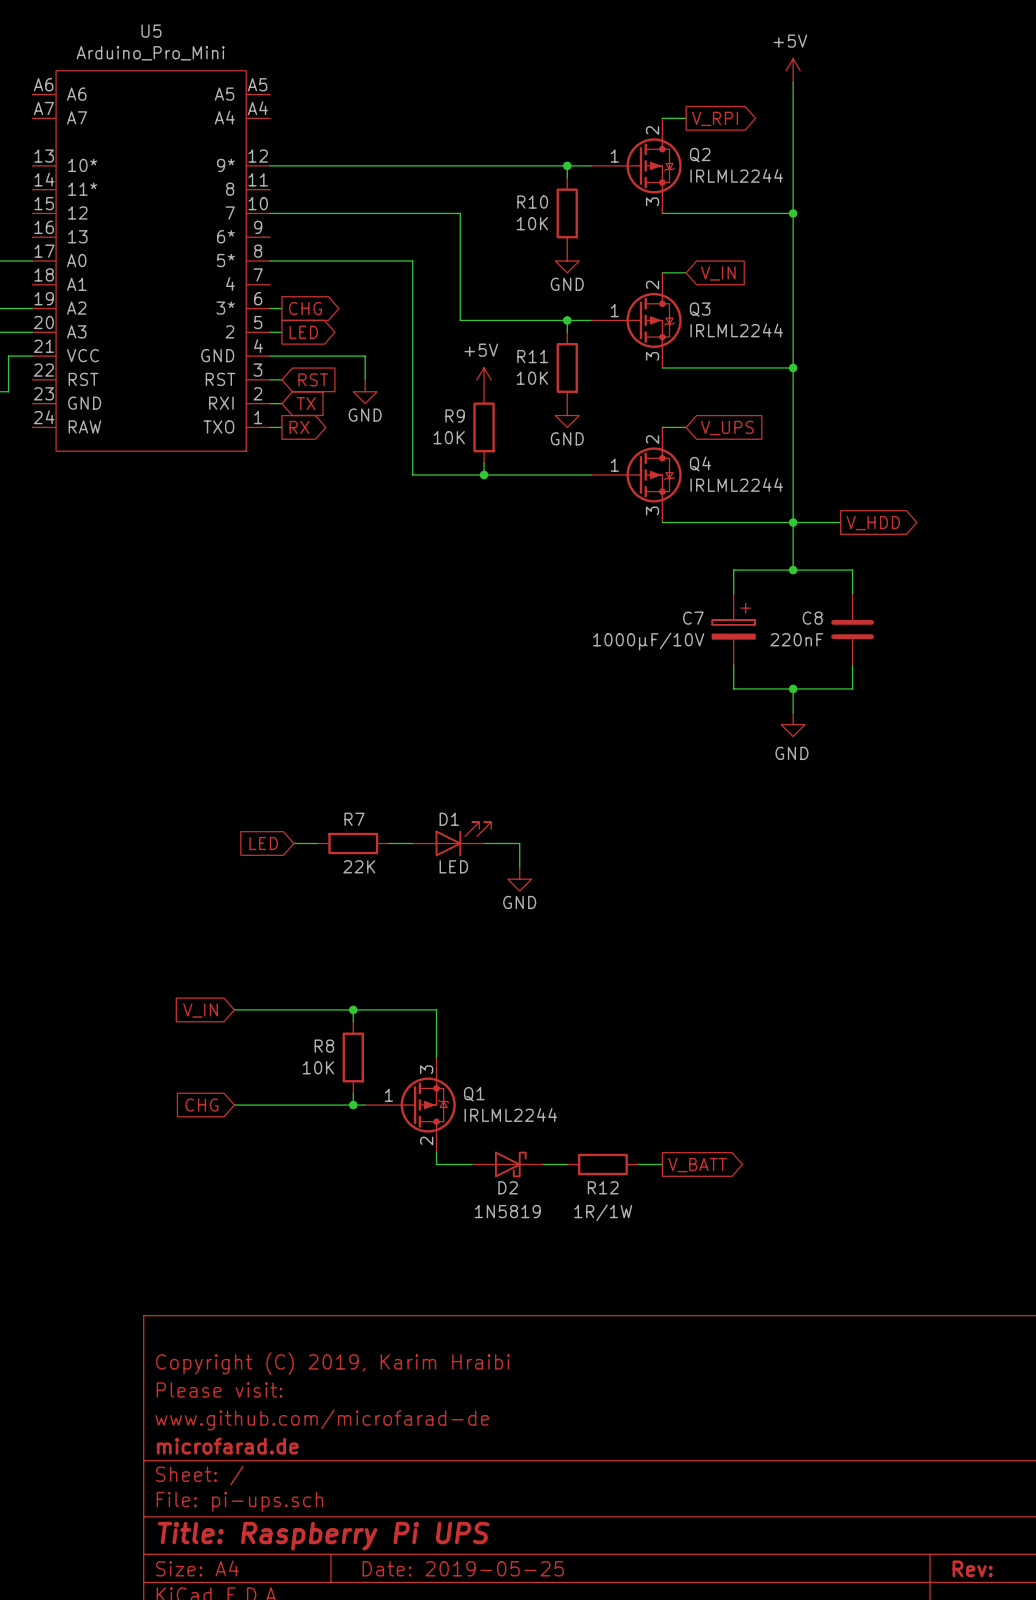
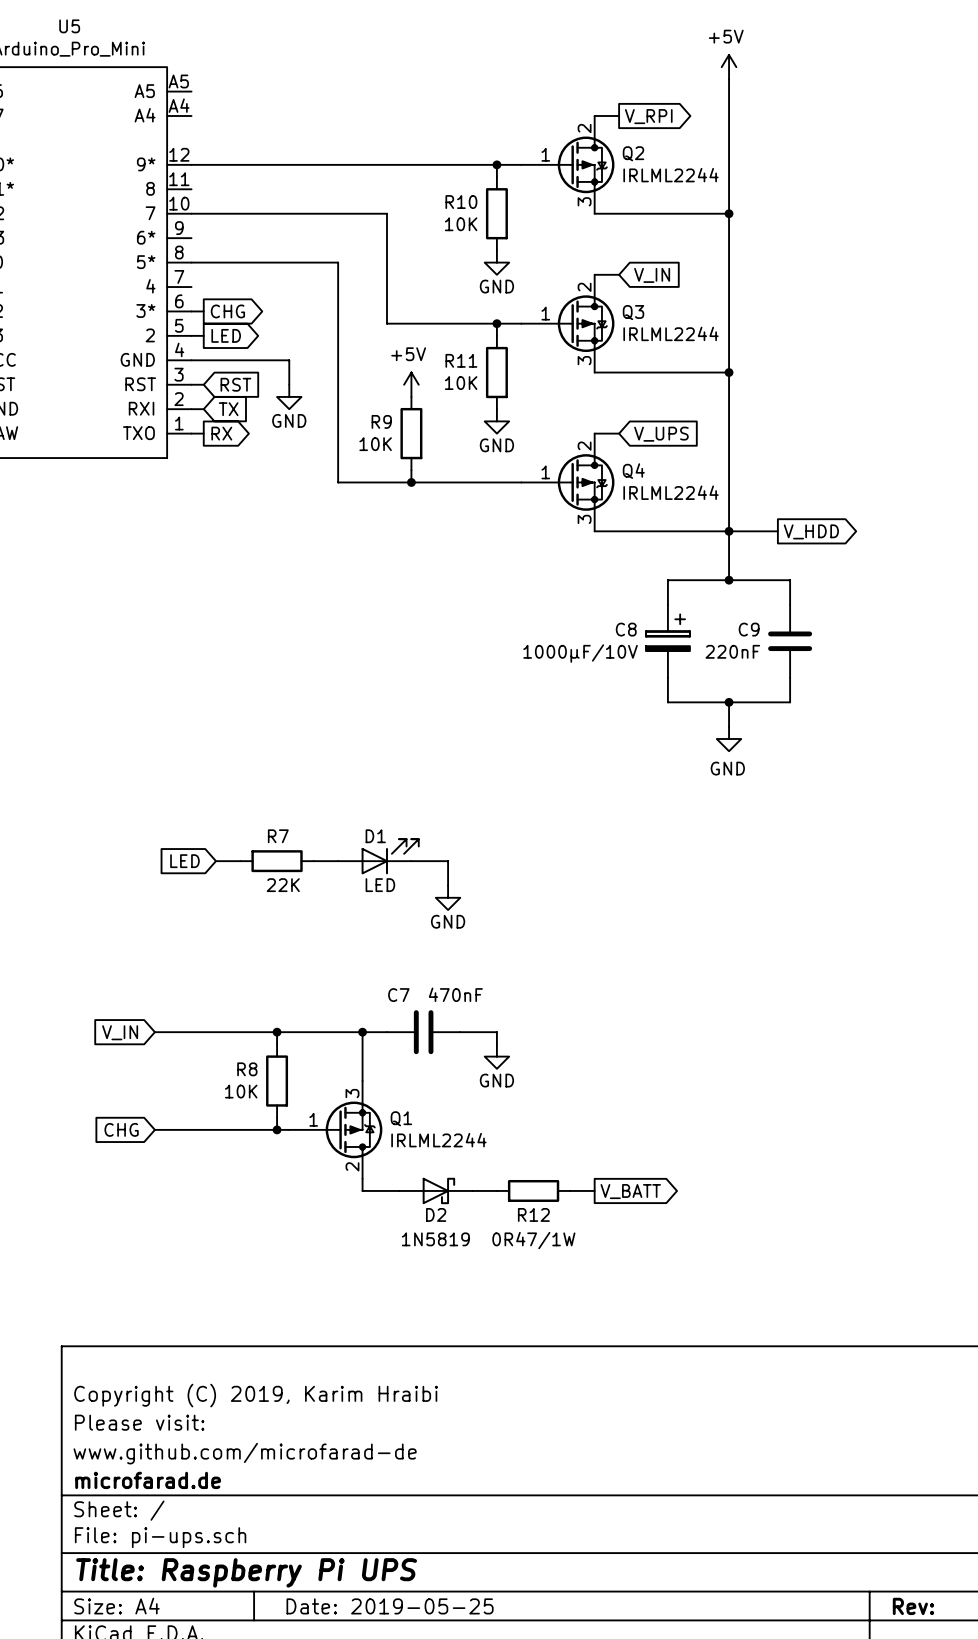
C7 name: C7 (693, 618) -> C8 (626, 629)
C8 name: C8 (812, 618) -> C9 (749, 629)
wire: none -> (362, 1032) (386, 1032)
junction: none -> (362, 1032)
C7: none -> 470nF (423, 1032)
wire: none -> (460, 1032) (496, 1032) (496, 1044)
power symbol: none -> GND (496, 1056)
R12 value: 1R/1W (603, 1212) -> 0R47/1W (533, 1240)

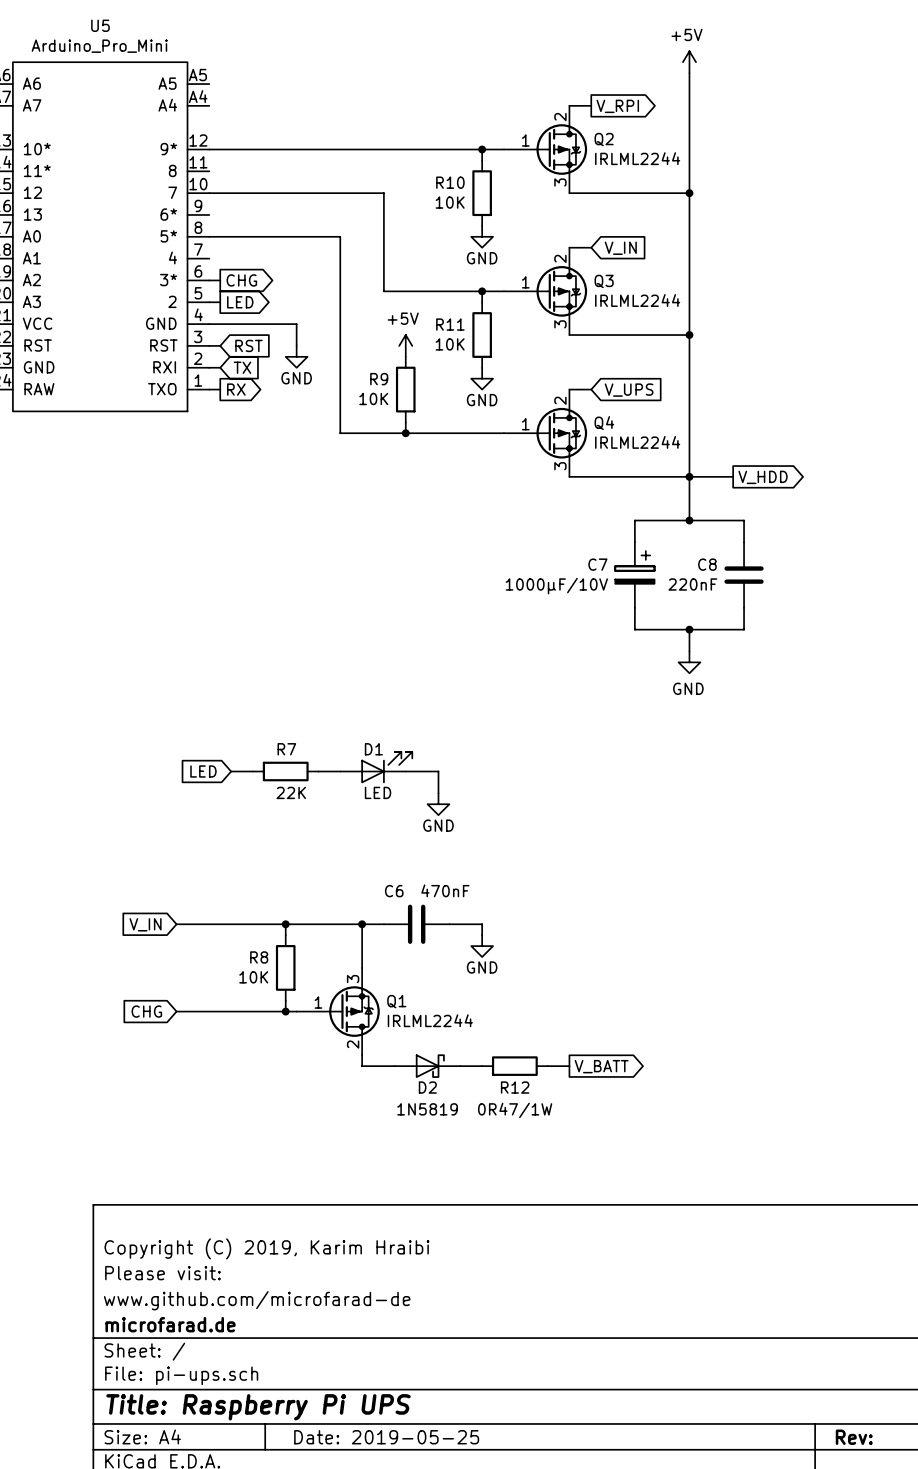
C8 name: C8 (626, 629) -> C7 (597, 564)
C9 name: C9 (749, 629) -> C8 (707, 564)
C7 name: C7 (398, 995) -> C6 (394, 891)

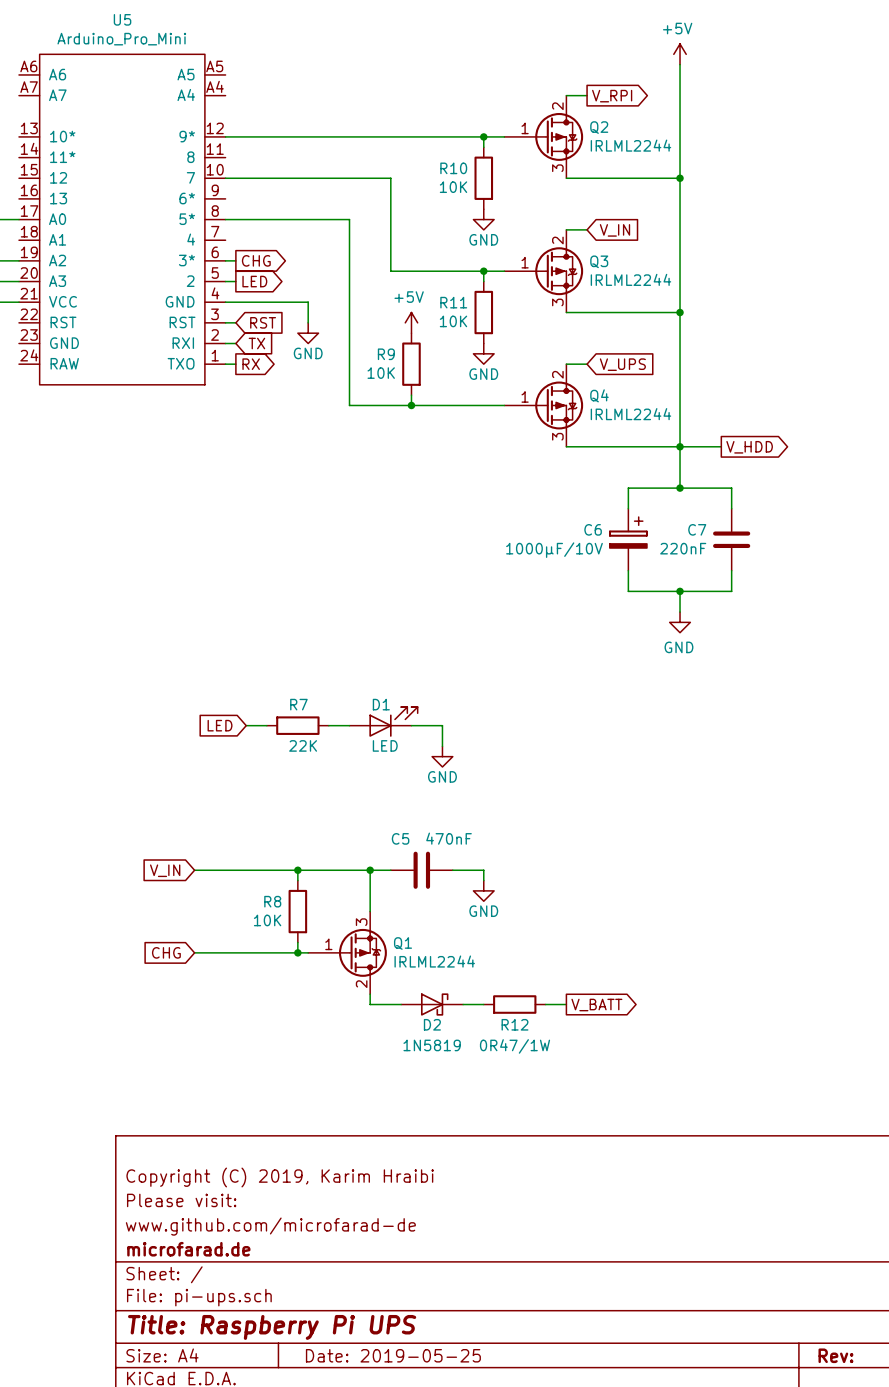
C7 name: C7 (597, 564) -> C6 (593, 529)
C8 name: C8 (707, 564) -> C7 (697, 529)
C6 name: C6 (394, 891) -> C5 (400, 838)

